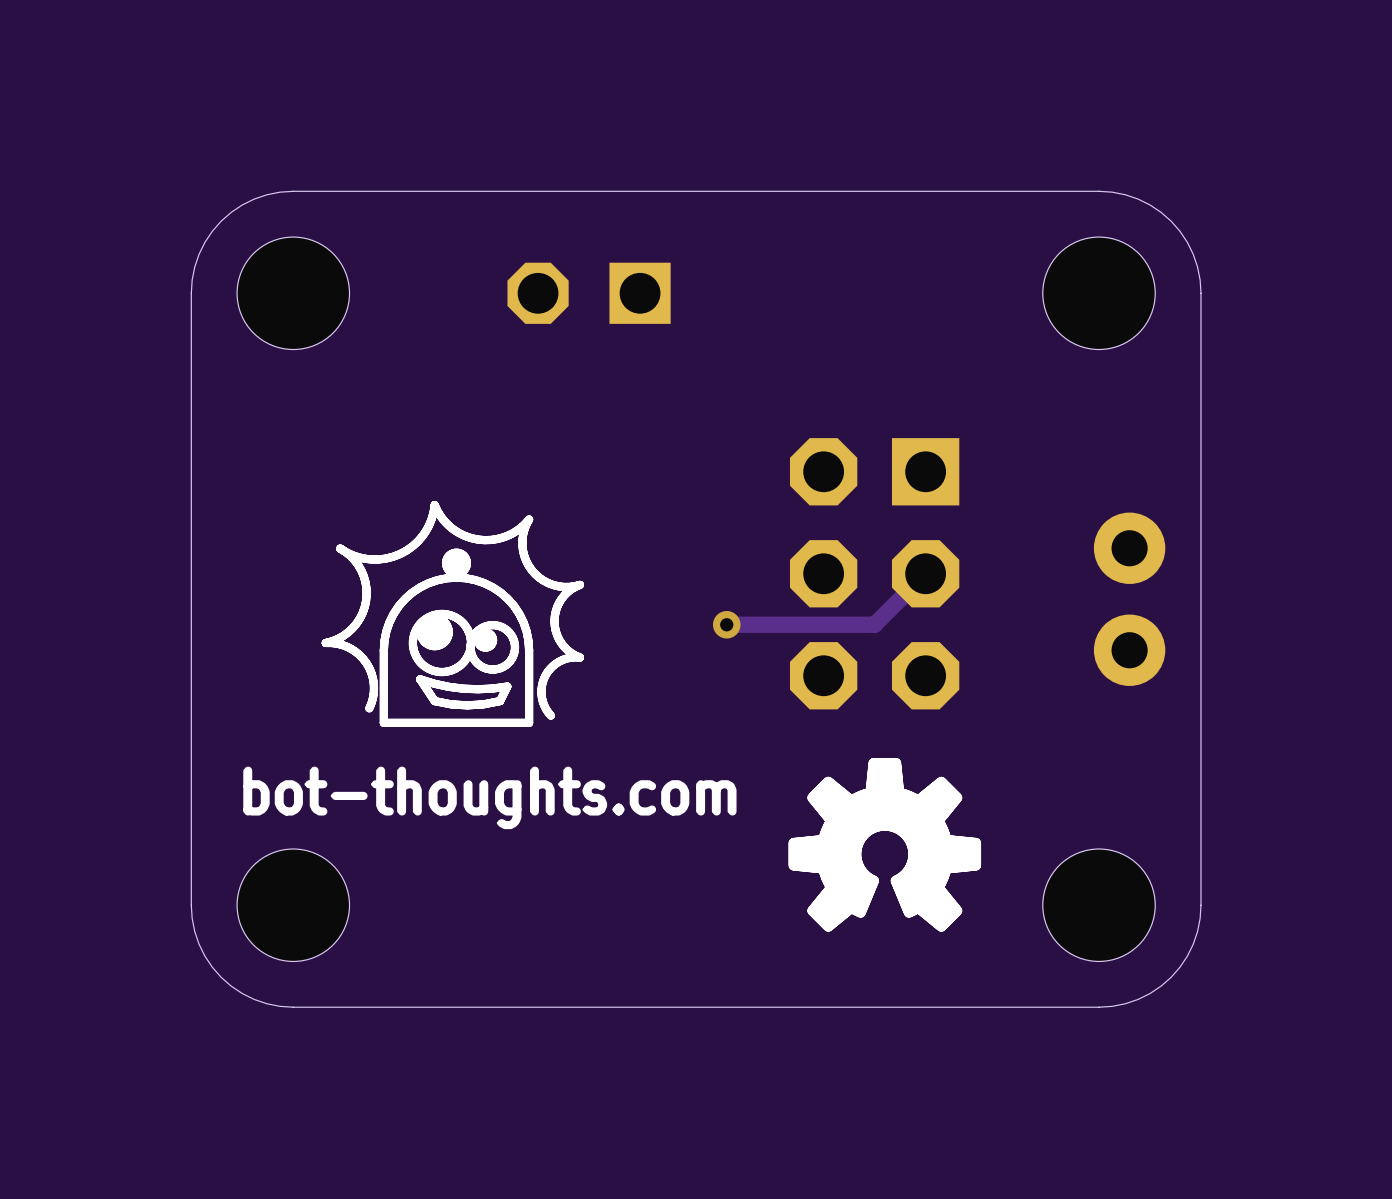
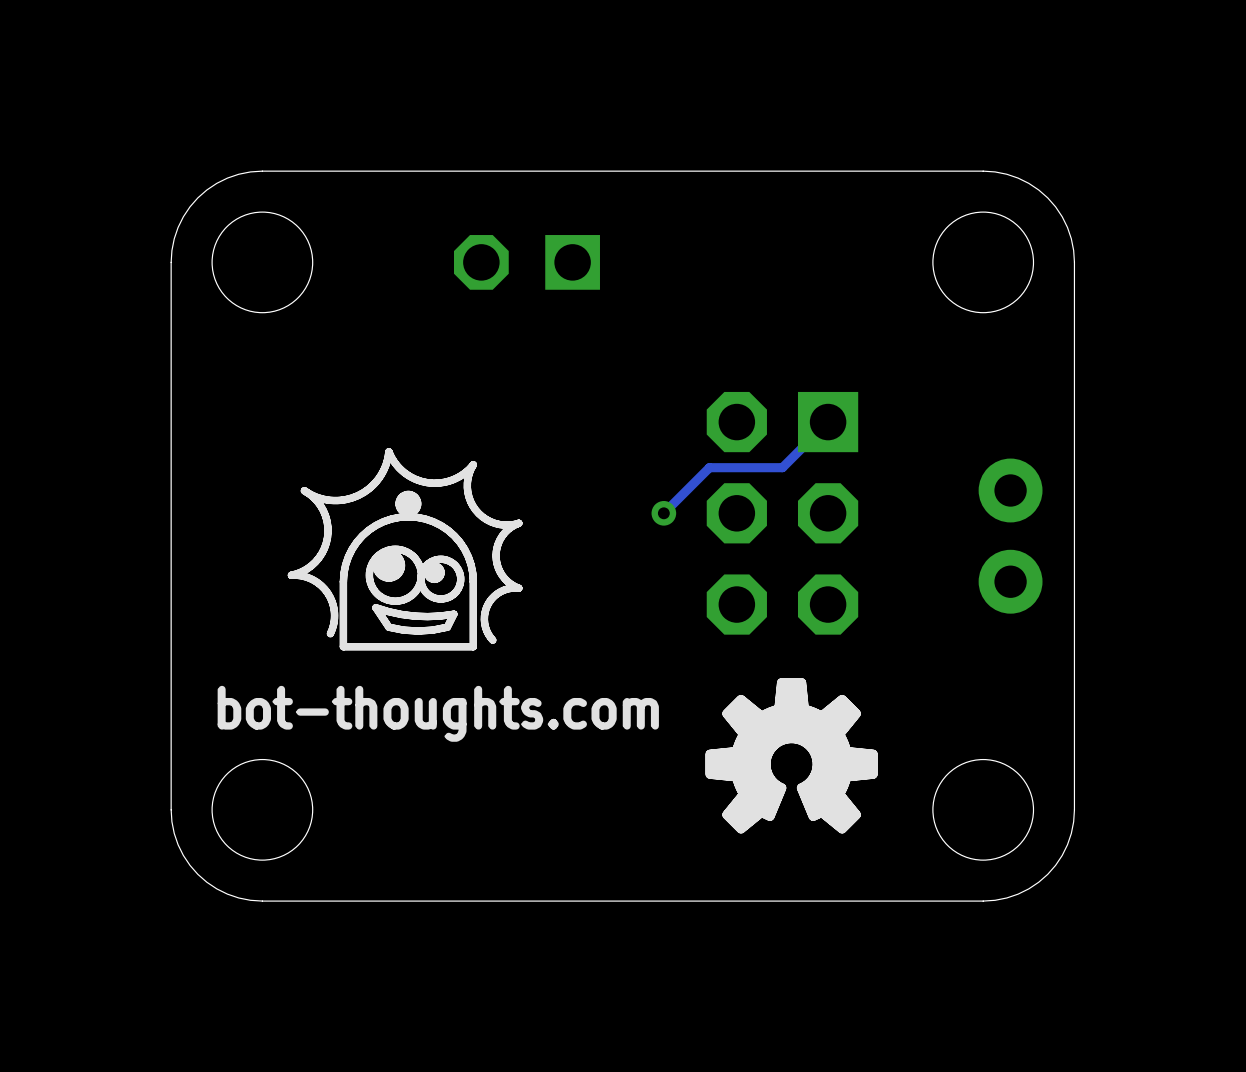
track: none -> (828, 422) (782, 467) (709, 467) (663, 513)
track: (925, 573) (874, 624) (726, 624) -> none
via position: (726, 624) -> (663, 513)

